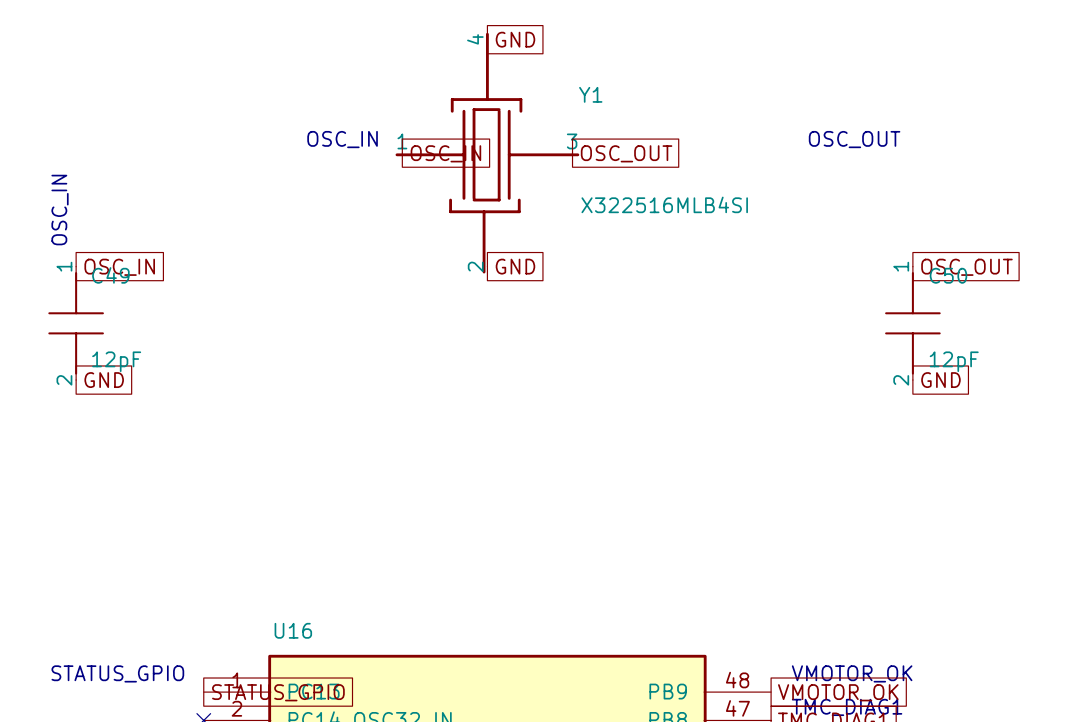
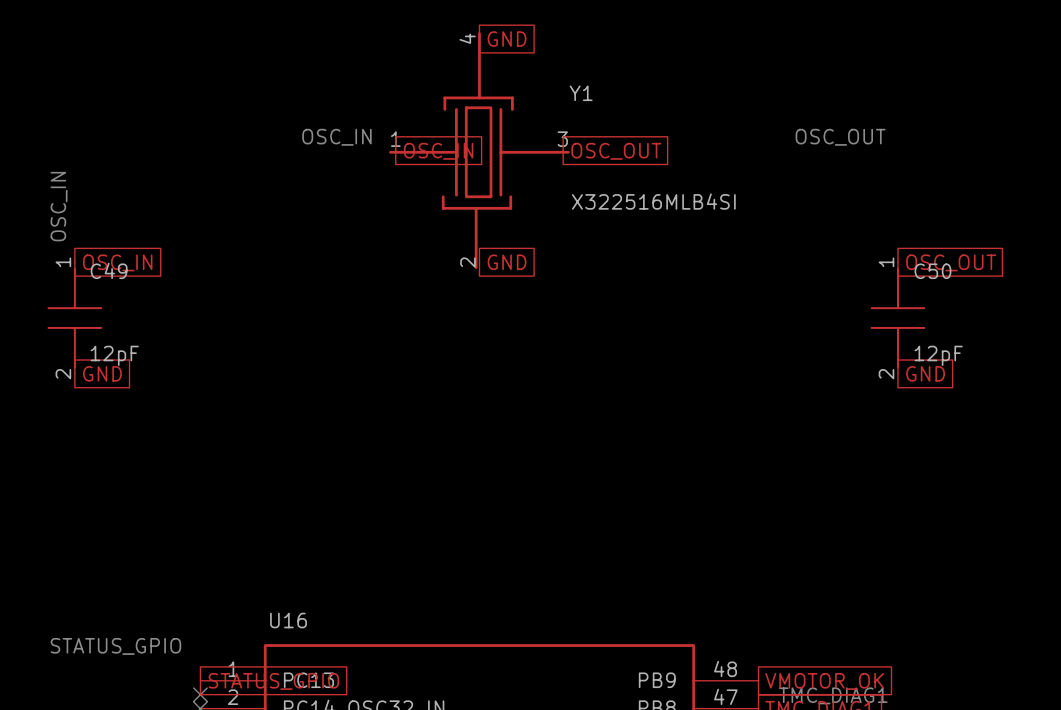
text position: STATUS_GPIO (117, 673) -> STATUS_GPIO (115, 646)
text: VMOTOR_OK (852, 673) -> none
no-connect mark: none -> (200, 694)

